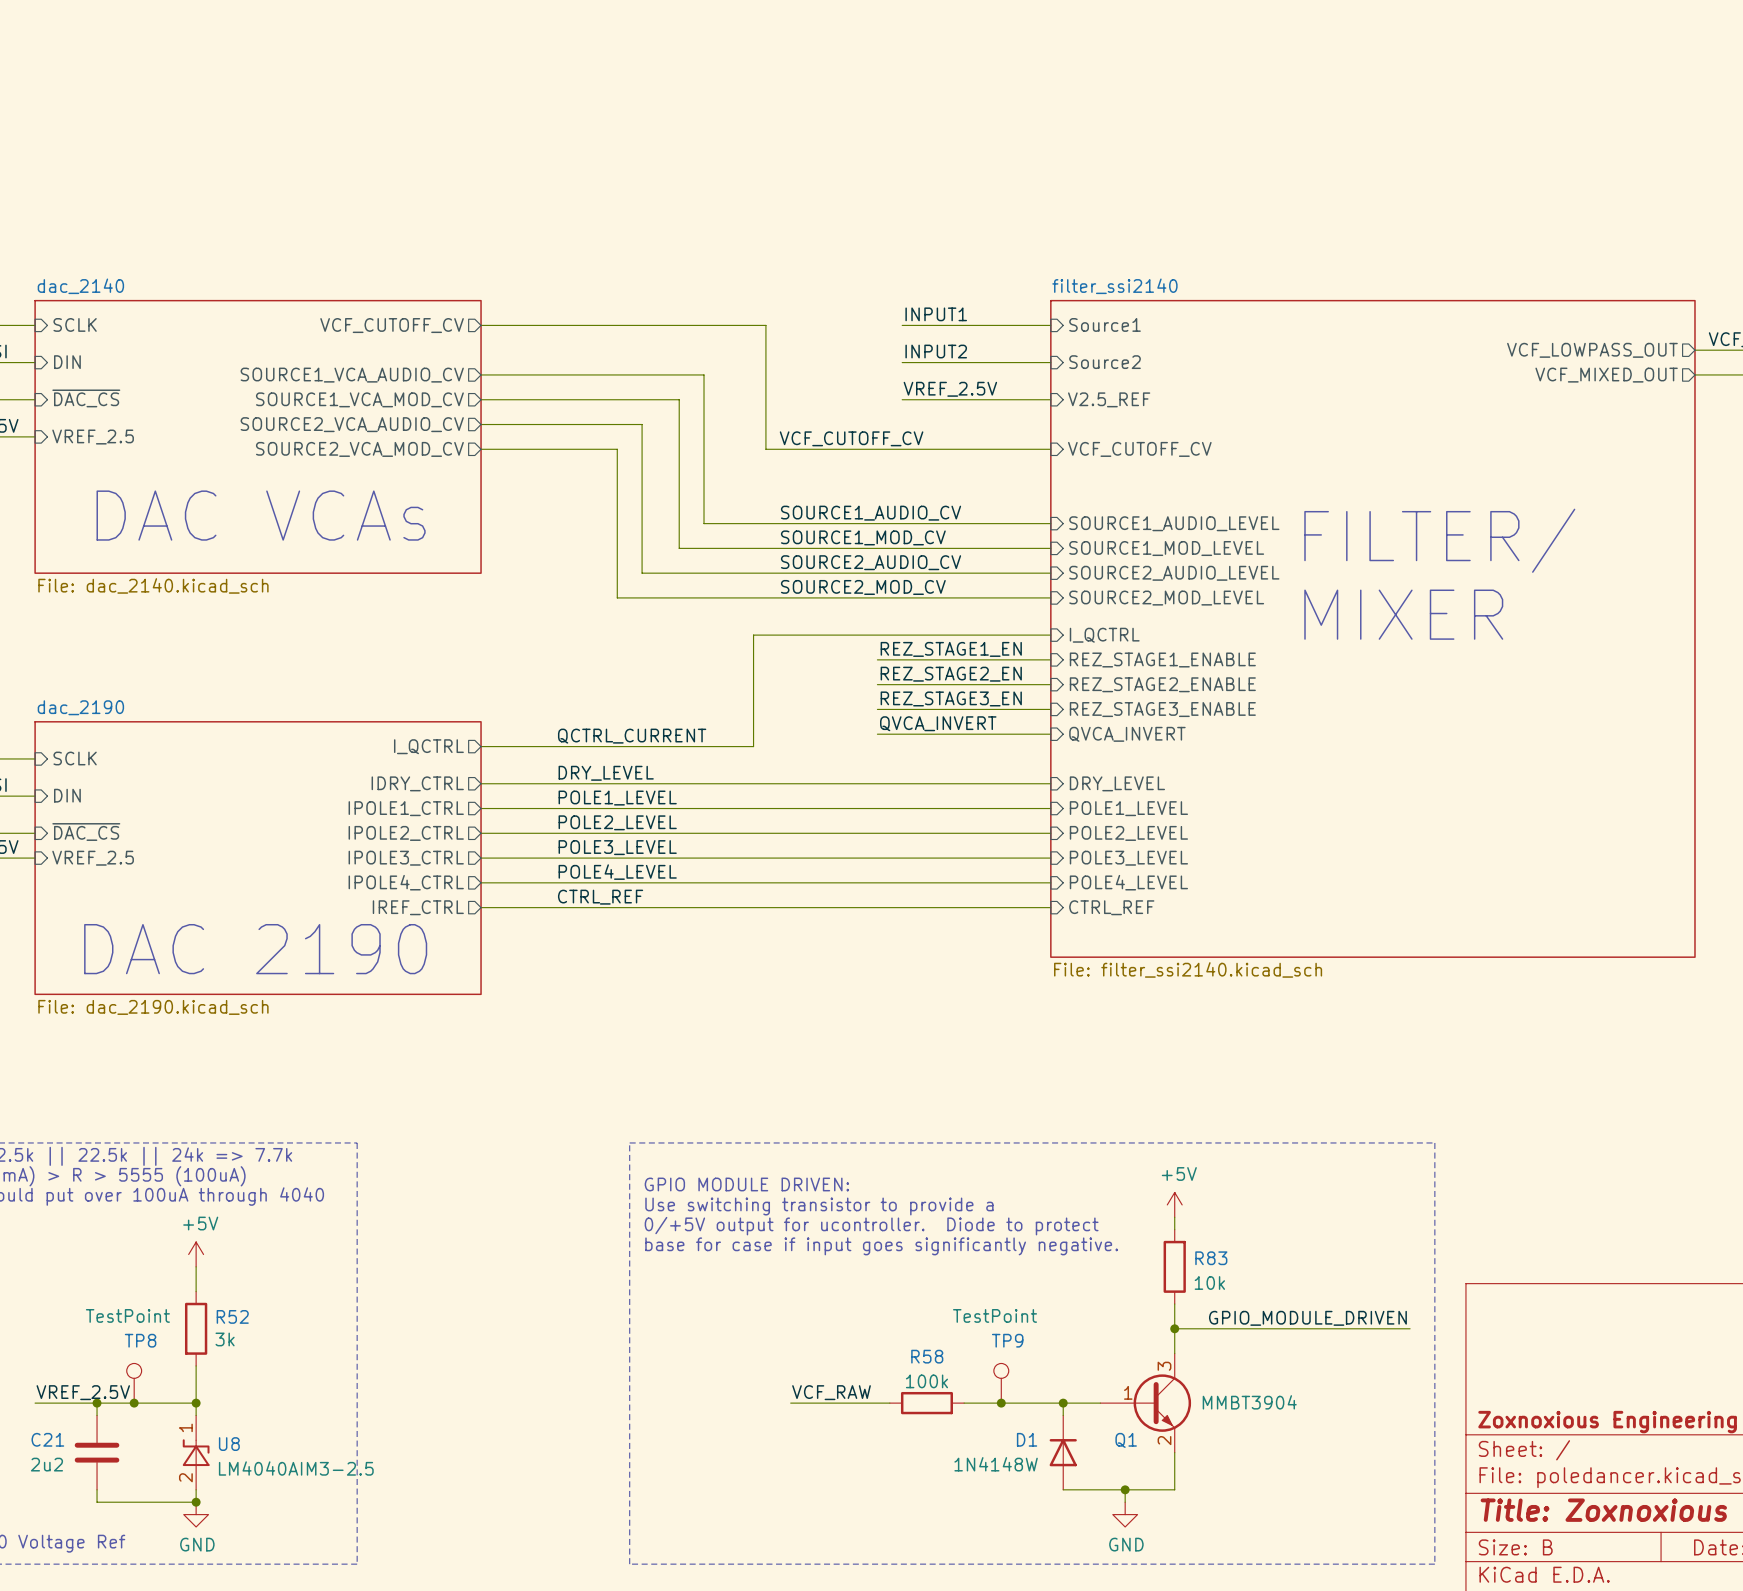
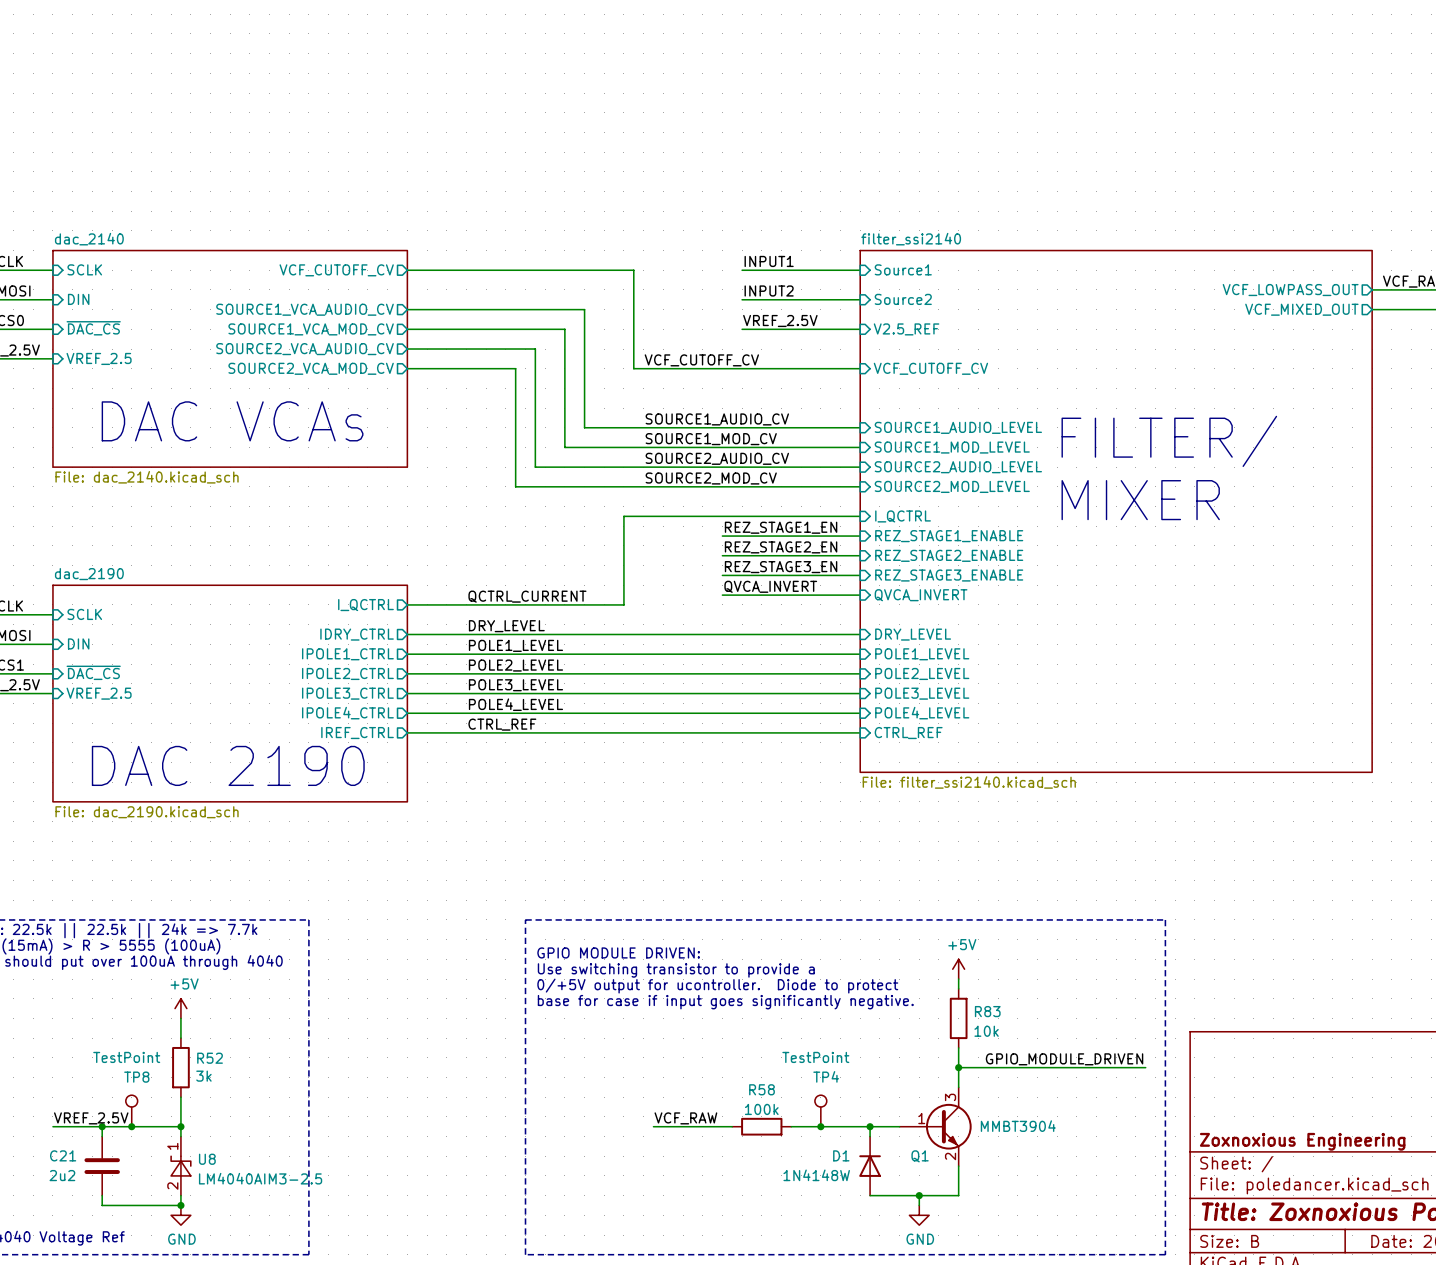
TP9 name: TP9 (1007, 1340) -> TP4 (826, 1076)

